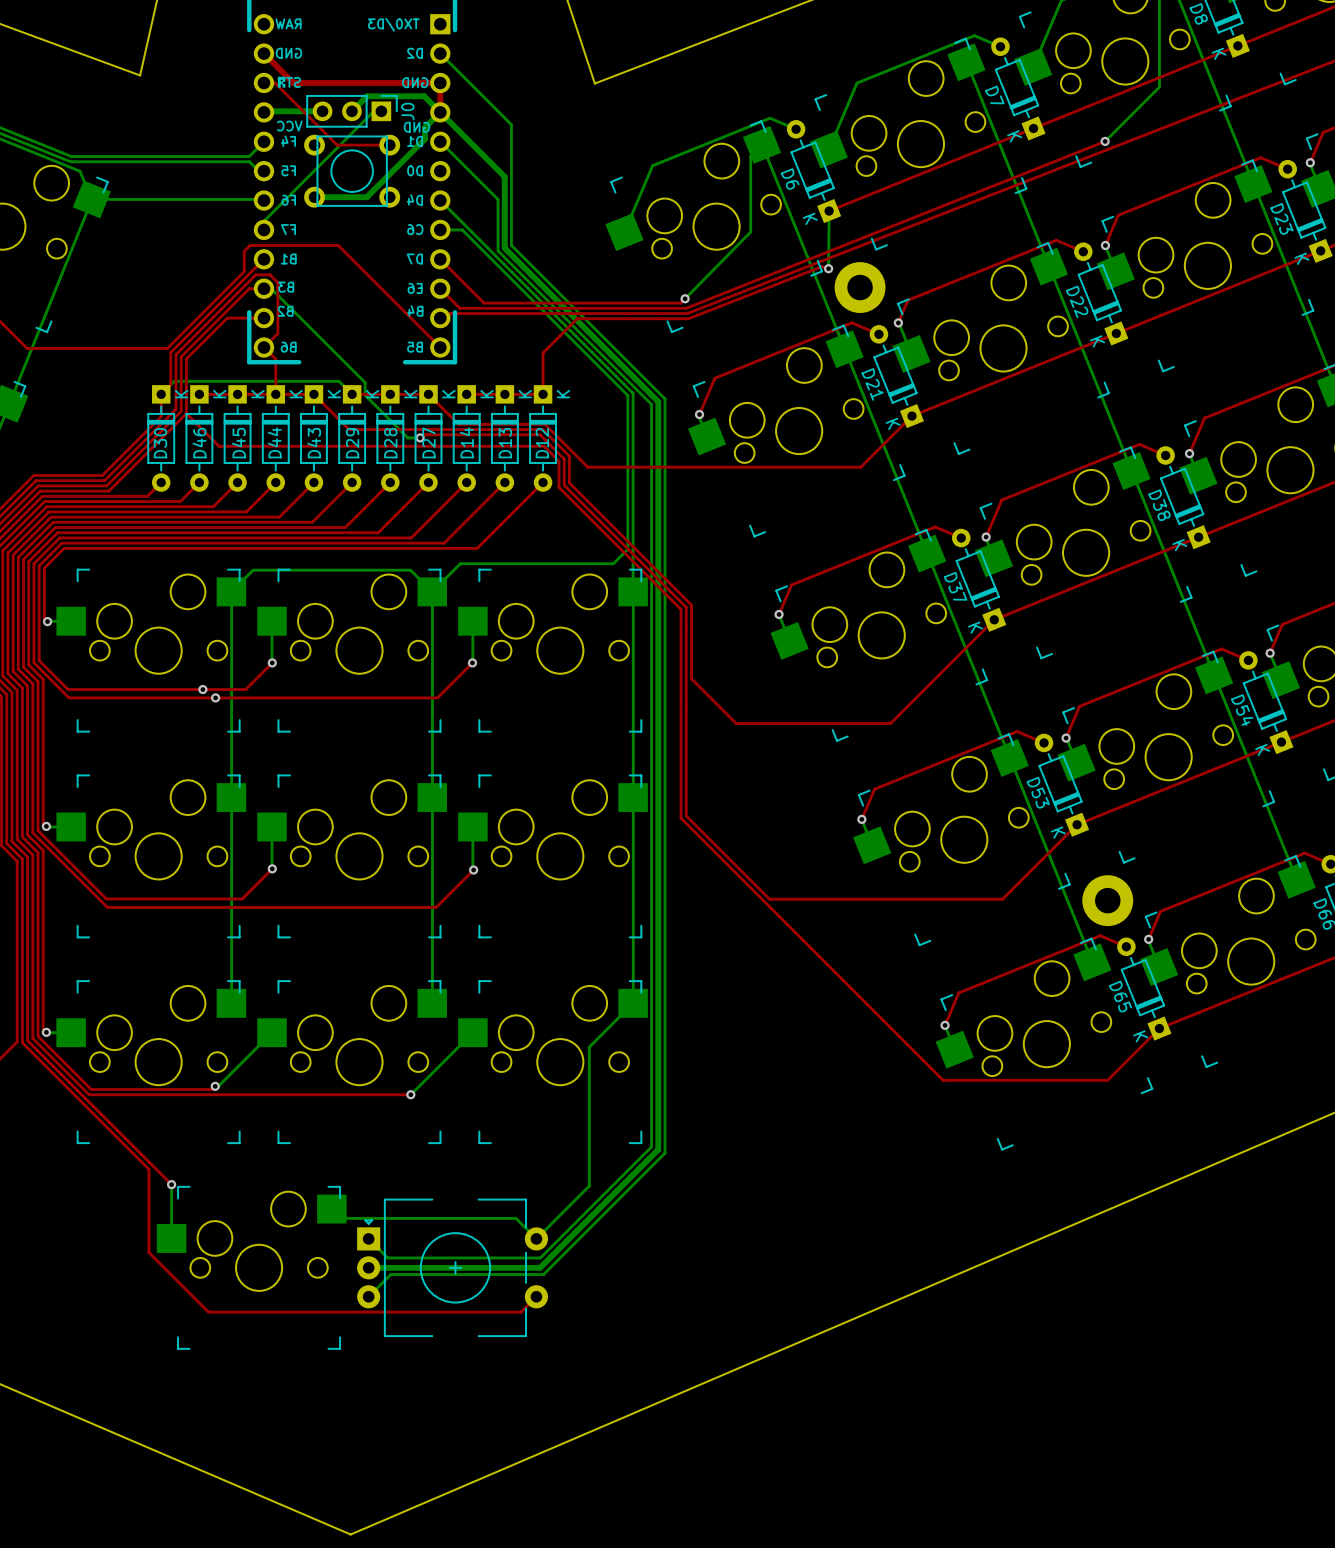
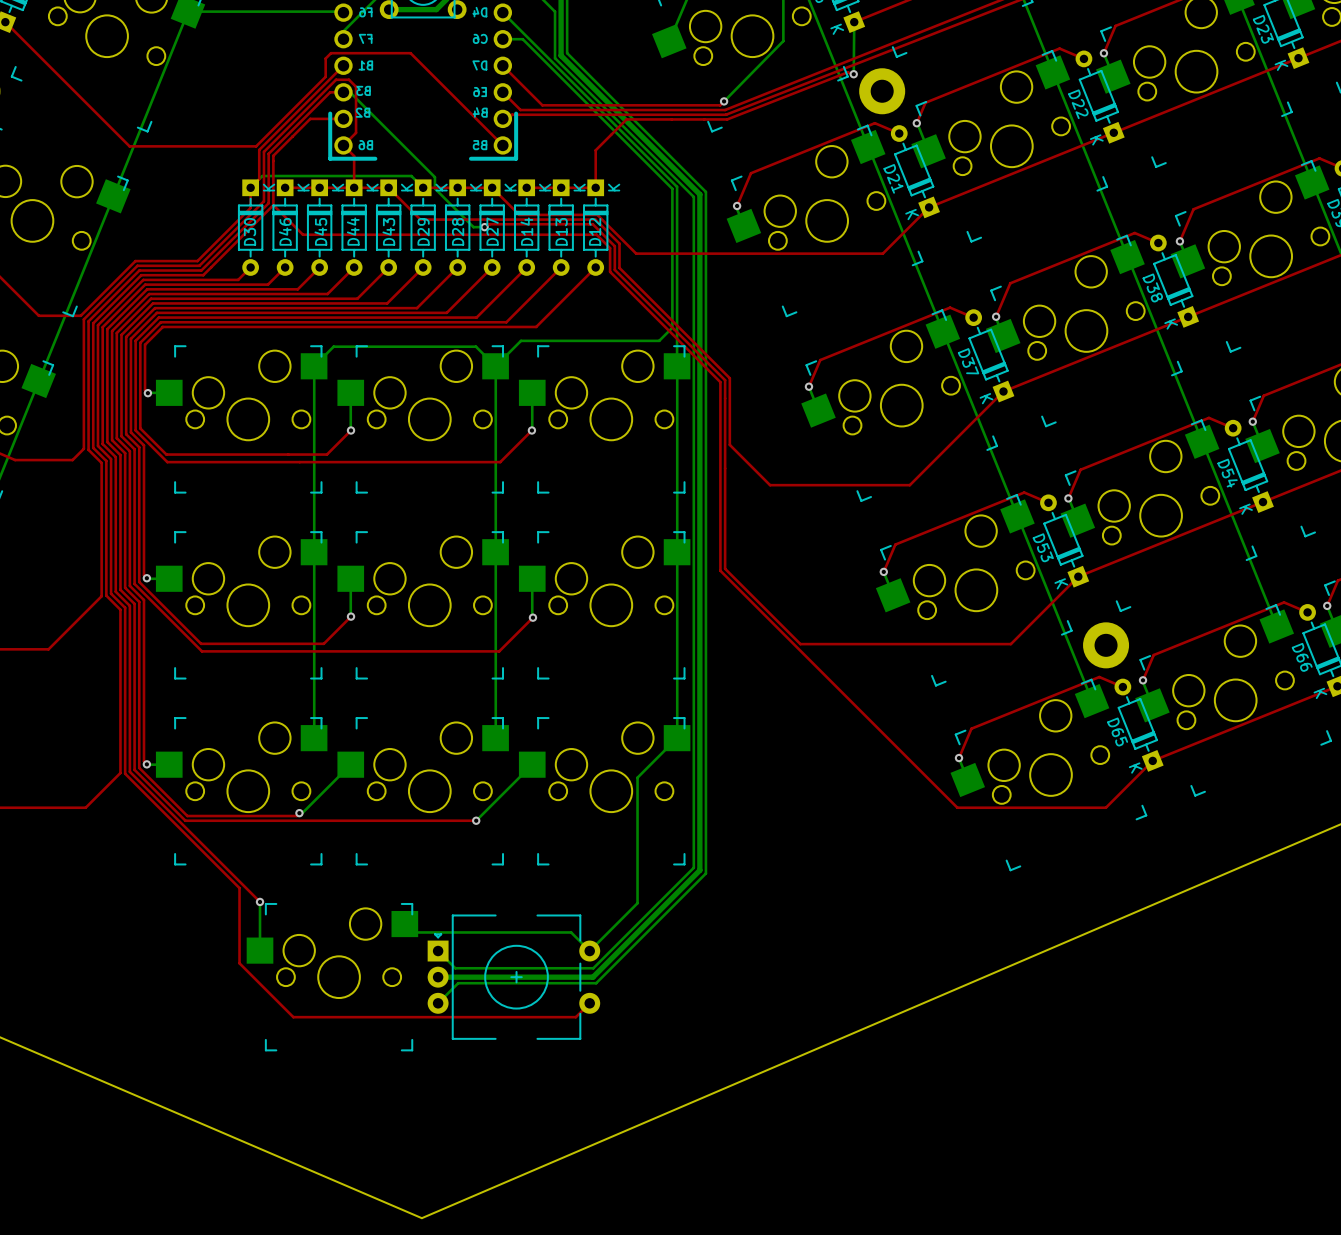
via: (202, 689) -> none
via: (215, 697) -> none

